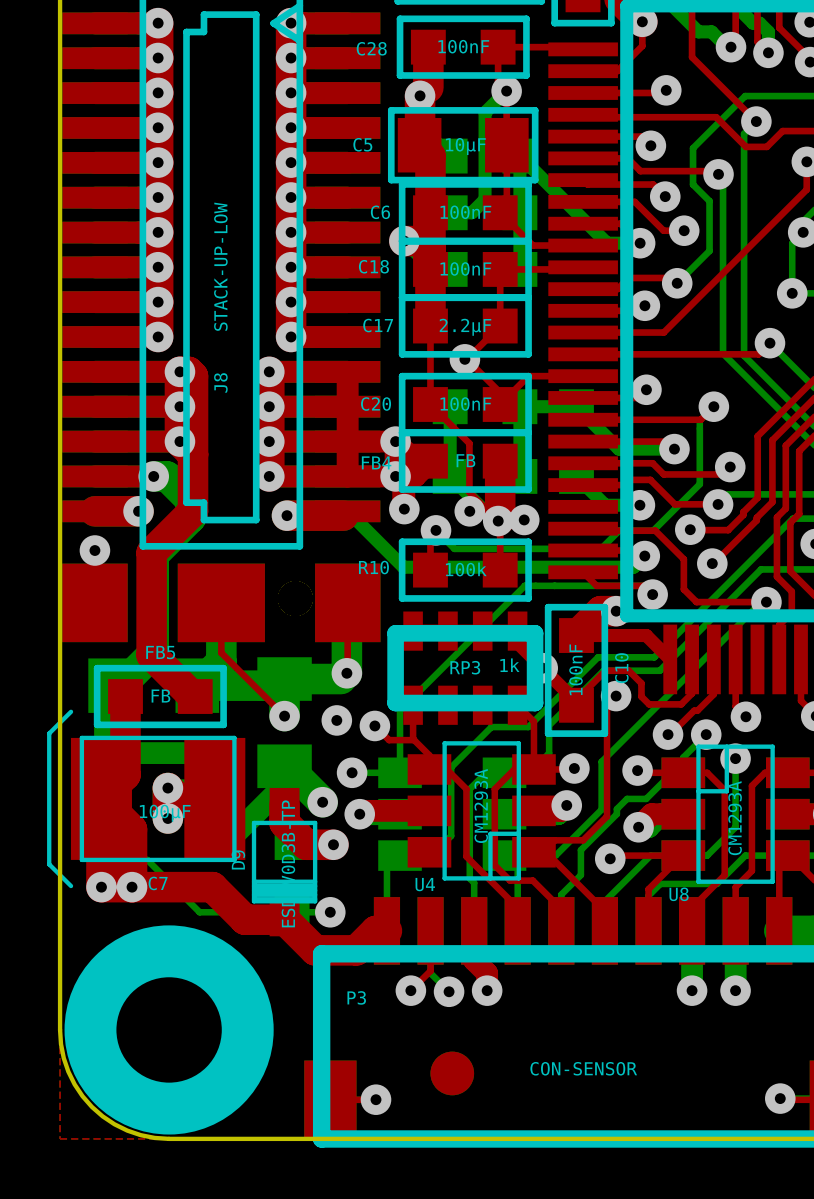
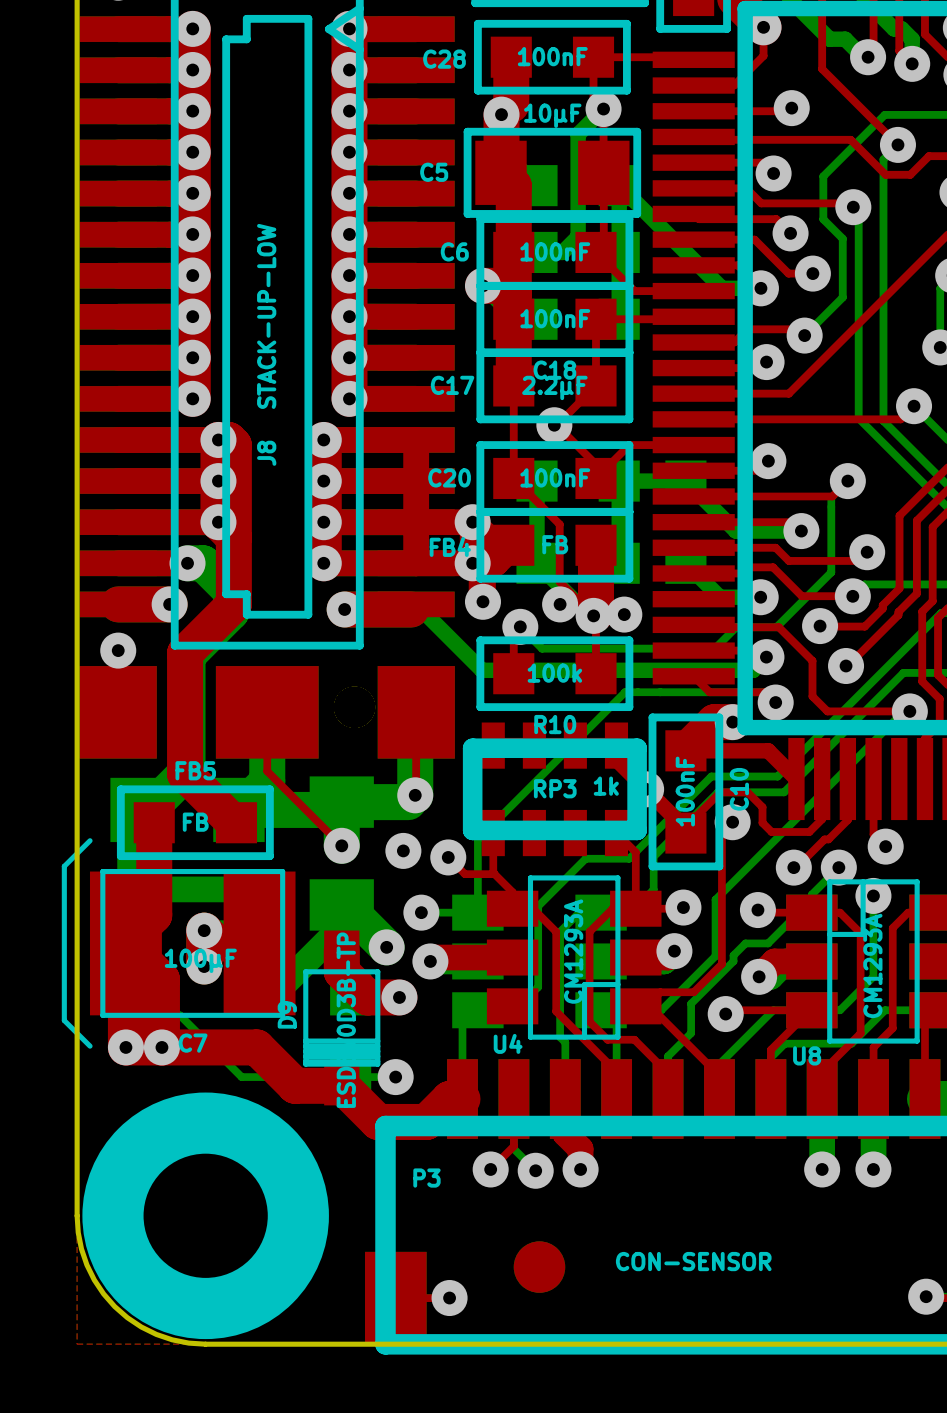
C5 value position: 10µF (465, 146) -> 10µF (552, 115)
C18 name position: C18 (373, 266) -> C18 (554, 370)
R10 name position: R10 (373, 567) -> R10 (555, 724)

